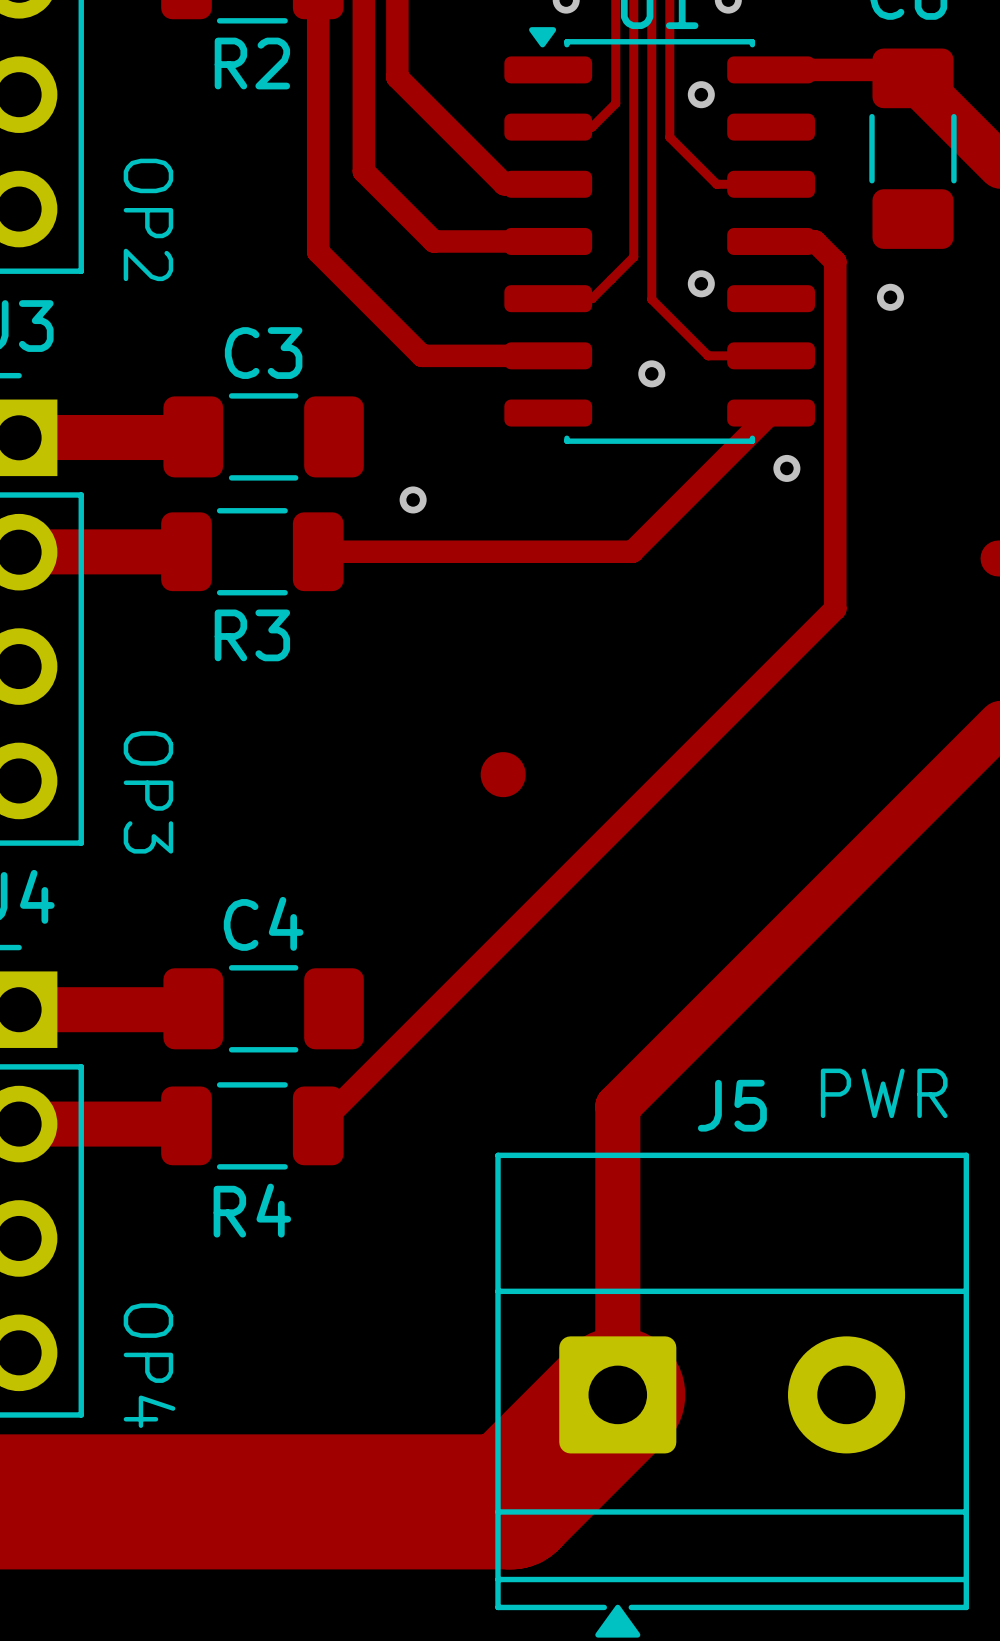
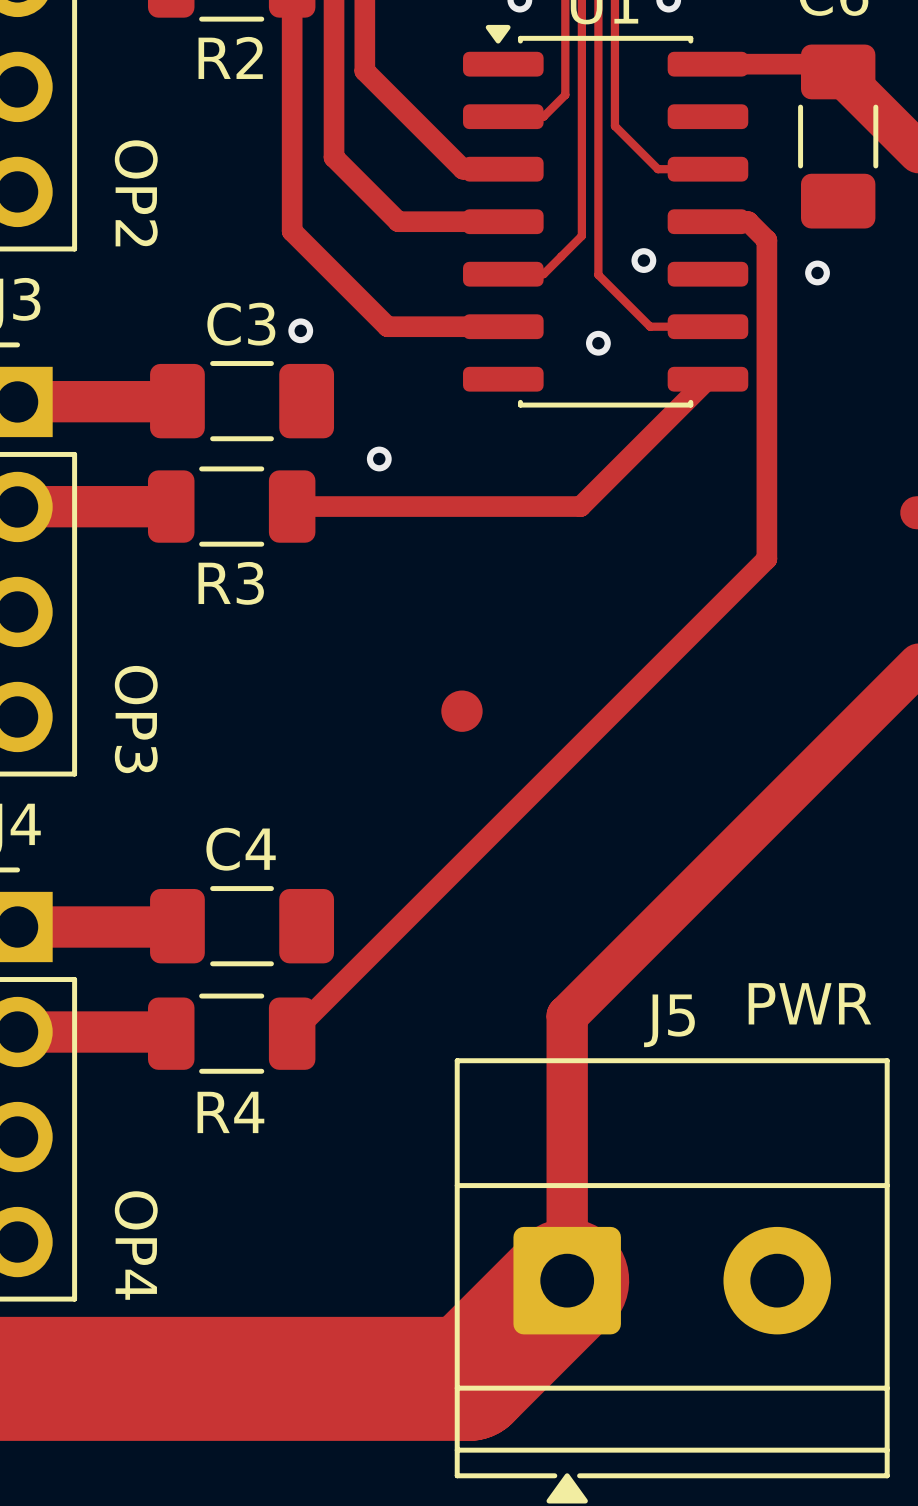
via: (701, 94) -> none
via: none -> (300, 330)
via: (786, 468) -> none

